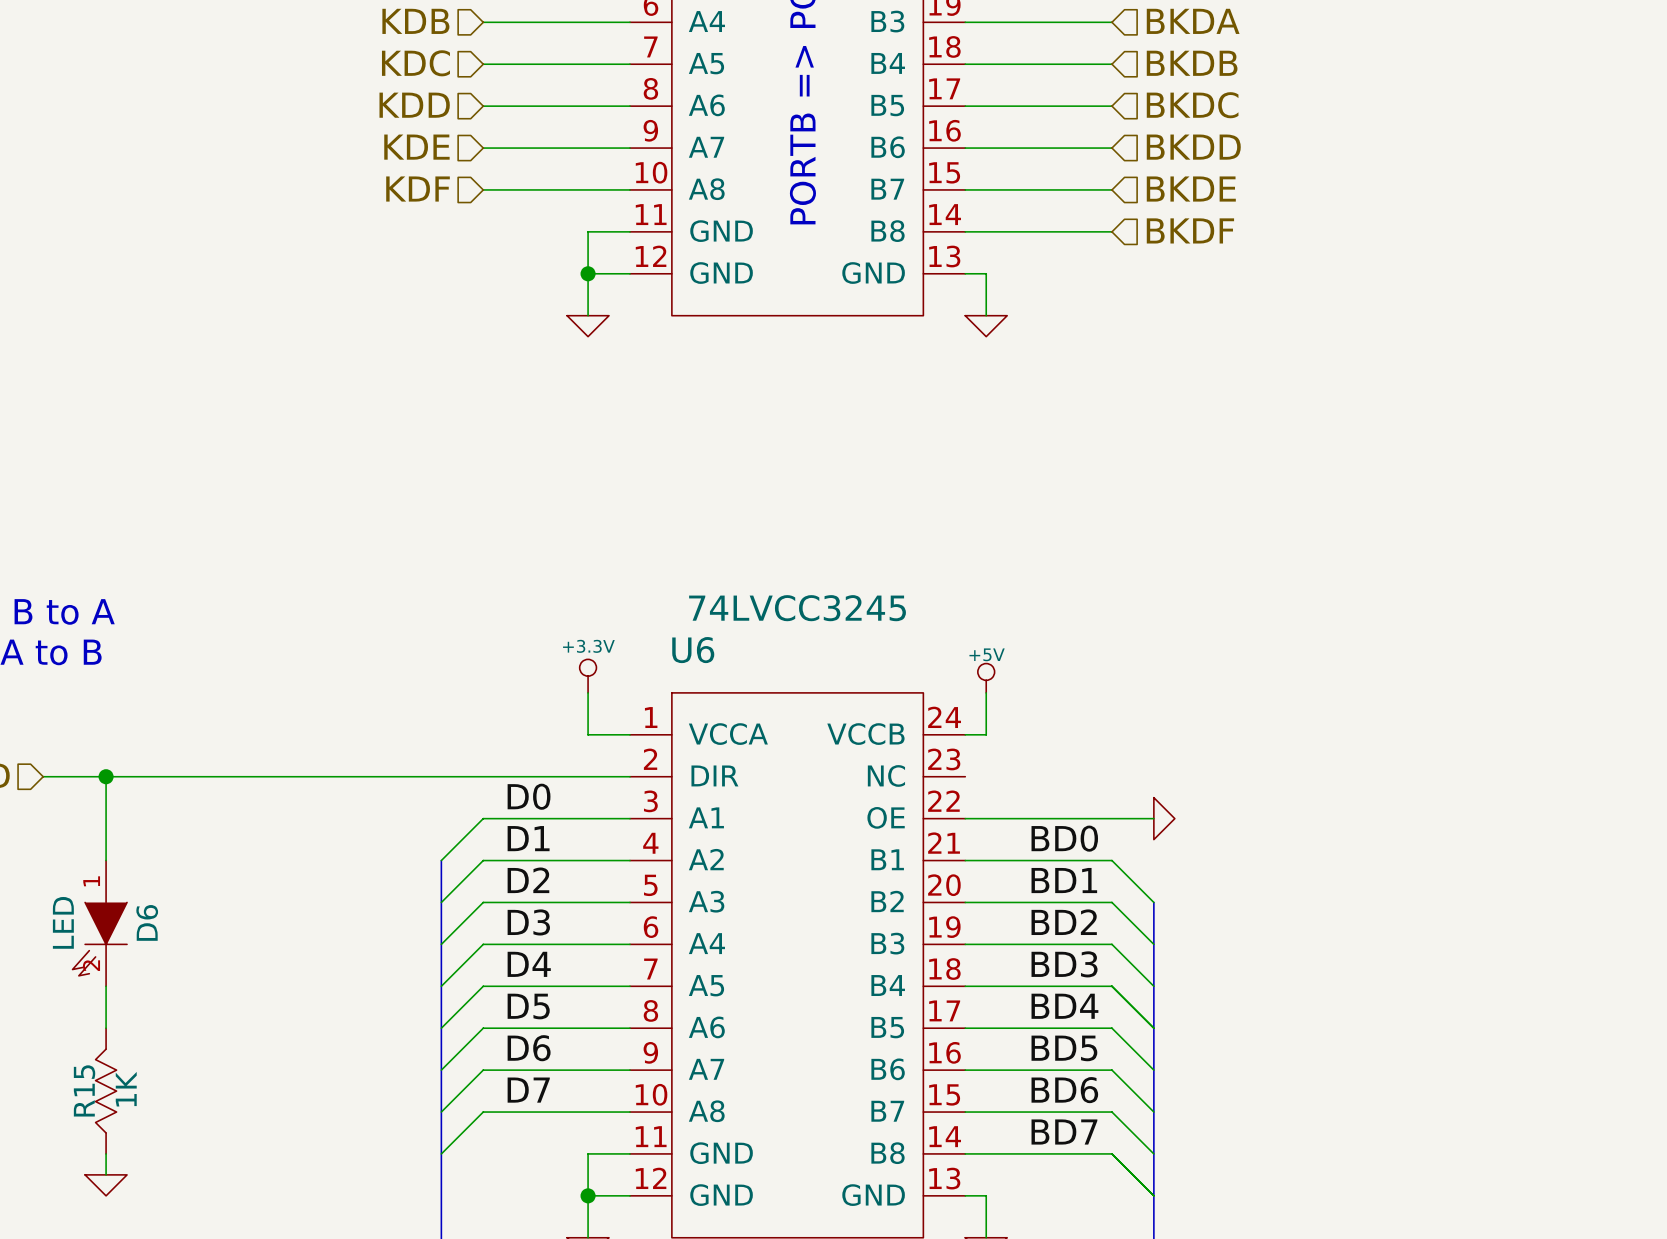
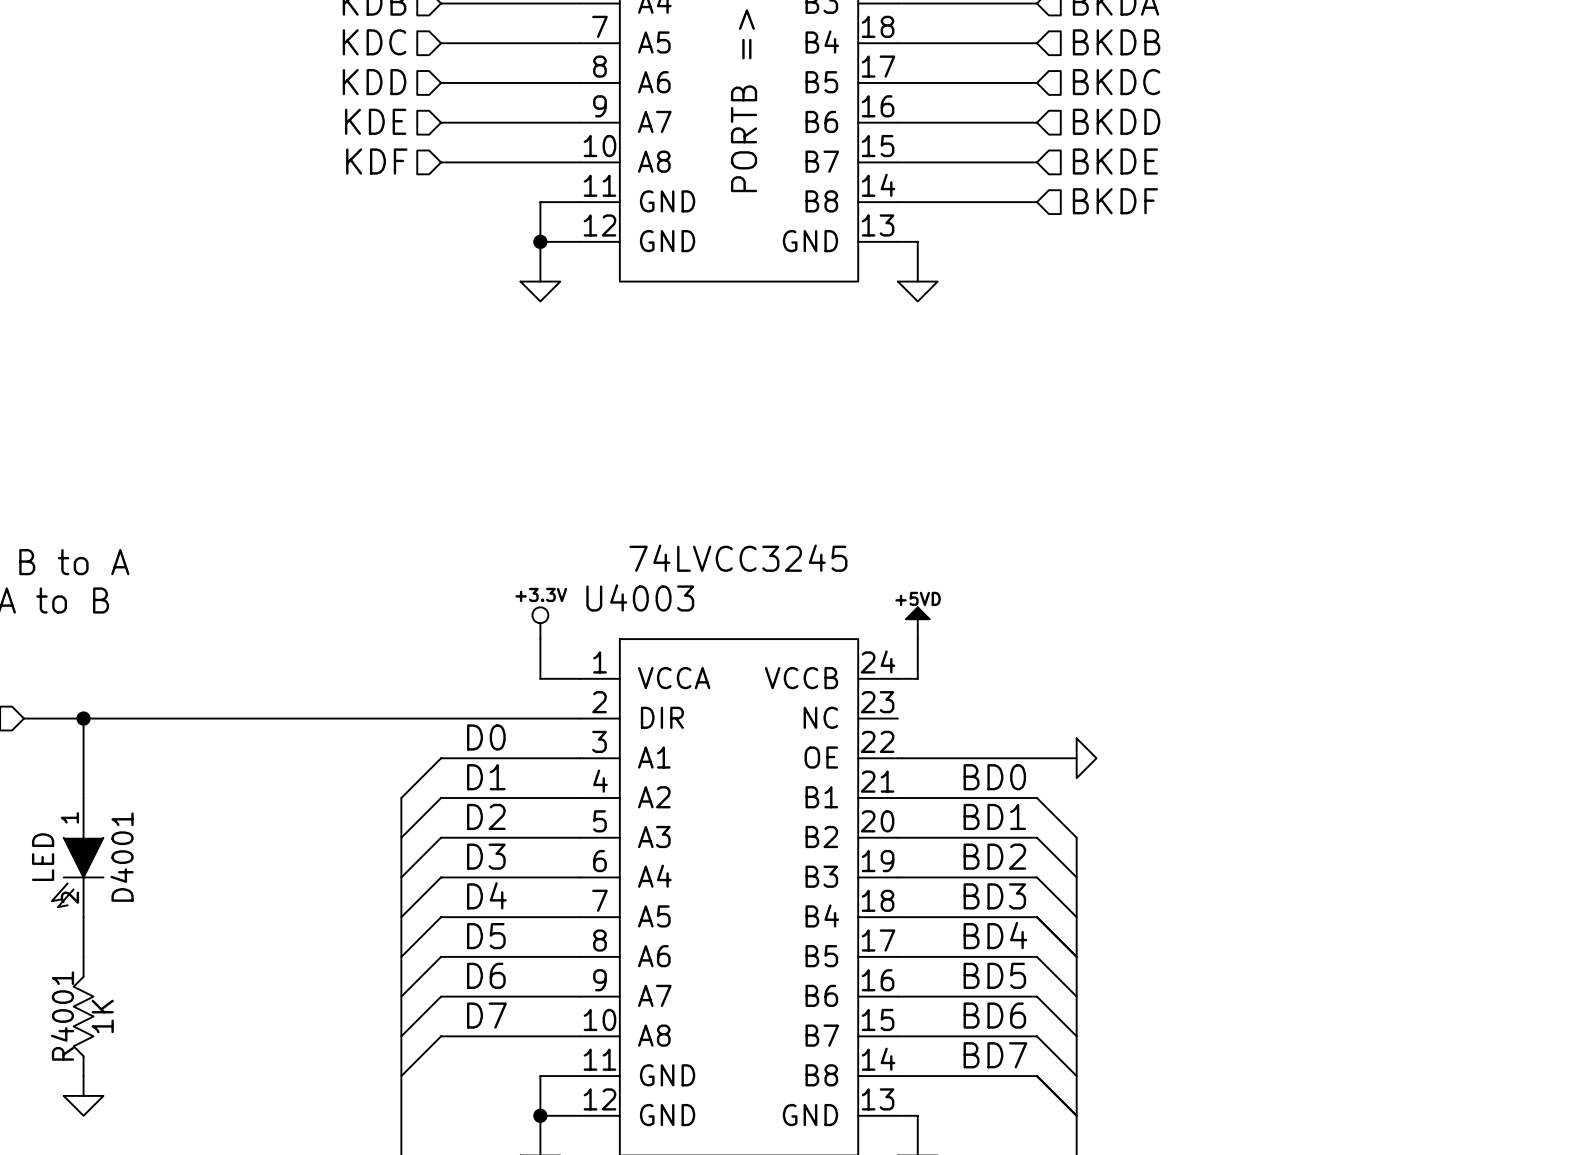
U6 name: U6 (693, 650) -> U4003 (640, 597)
power symbol: +5V (986, 678) -> +5VD (917, 623)
D6 name: D6 (147, 922) -> D4001 (122, 857)
R15 name: R15 (84, 1090) -> R4001 (62, 1016)

